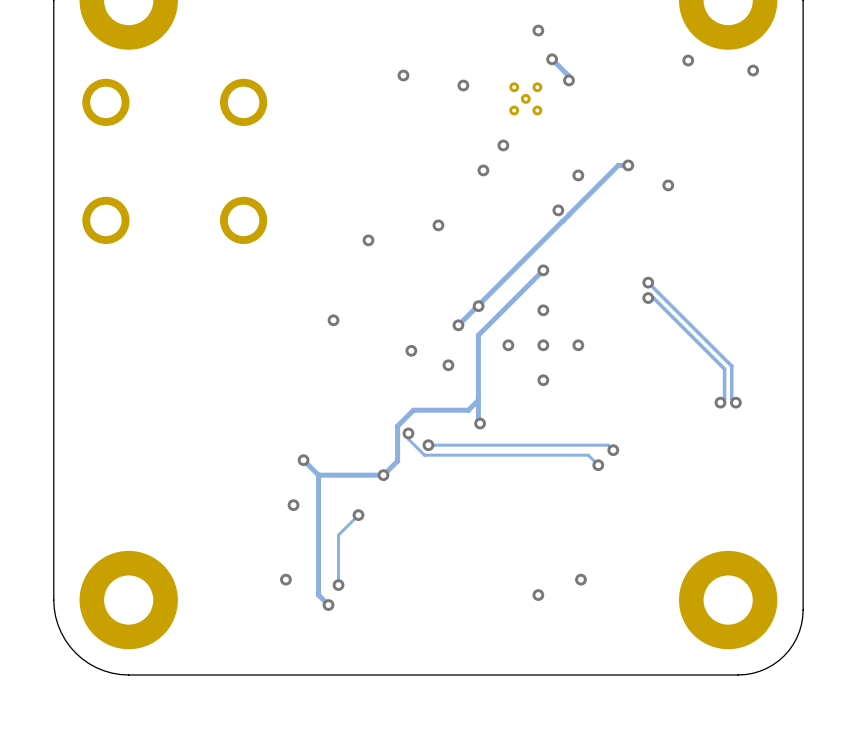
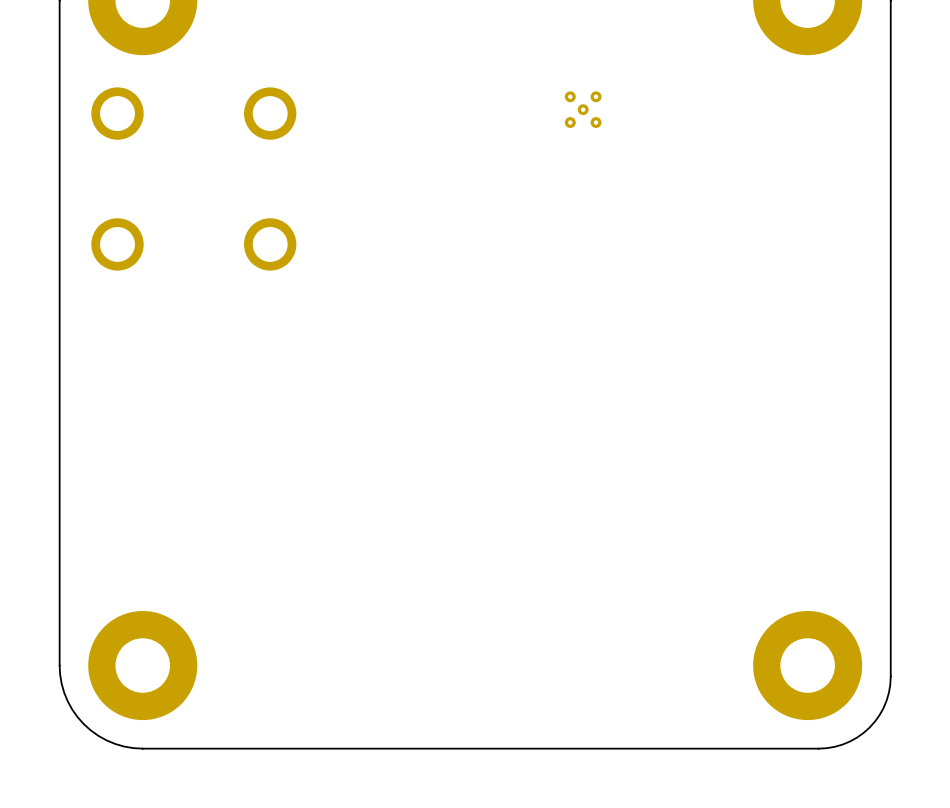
via: (538, 30) -> none
track: (552, 59) (568, 76) (568, 80) -> none
via: (552, 59) -> none
via: (688, 60) -> none
via: (753, 70) -> none
via: (403, 75) -> none
via: (568, 80) -> none
via: (463, 85) -> none
via: (503, 145) -> none
track: (628, 165) (618, 165) (569, 214) -> none
via: (628, 165) -> none
via: (483, 170) -> none
via: (578, 175) -> none
via: (668, 185) -> none
via: (558, 210) -> none
track: (569, 214) (562, 221) -> none
track: (562, 221) (458, 325) -> none
via: (438, 225) -> none
via: (368, 240) -> none
track: (543, 270) (478, 335) (478, 421) (480, 423) -> none
via: (543, 270) -> none
track: (648, 282) (731, 366) (731, 398) (735, 402) -> none
via: (648, 282) -> none
track: (648, 298) (653, 298) (724, 369) (724, 398) (720, 402) -> none
via: (648, 298) -> none
via: (478, 306) -> none
via: (543, 310) -> none
via: (333, 320) -> none
via: (458, 325) -> none
via: (508, 345) -> none
via: (543, 345) -> none
via: (578, 345) -> none
via: (411, 350) -> none
via: (448, 365) -> none
via: (543, 380) -> none
track: (478, 400) (468, 410) (413, 410) (397, 426) (397, 461) (383, 475) (318, 475) -> none
via: (720, 402) -> none
via: (735, 402) -> none
via: (480, 423) -> none
track: (408, 433) (408, 439) (424, 455) (588, 455) (598, 465) -> none
via: (408, 433) -> none
track: (428, 445) (608, 445) (613, 450) -> none
via: (428, 445) -> none
via: (613, 450) -> none
track: (303, 460) (318, 475) -> none
via: (303, 460) -> none
via: (598, 465) -> none
track: (318, 475) (318, 595) (328, 605) -> none
via: (383, 475) -> none
via: (293, 505) -> none
track: (358, 515) (338, 535) (338, 585) -> none
via: (358, 515) -> none
via: (285, 579) -> none
via: (580, 579) -> none
via: (338, 585) -> none
via: (538, 595) -> none
via: (328, 605) -> none

